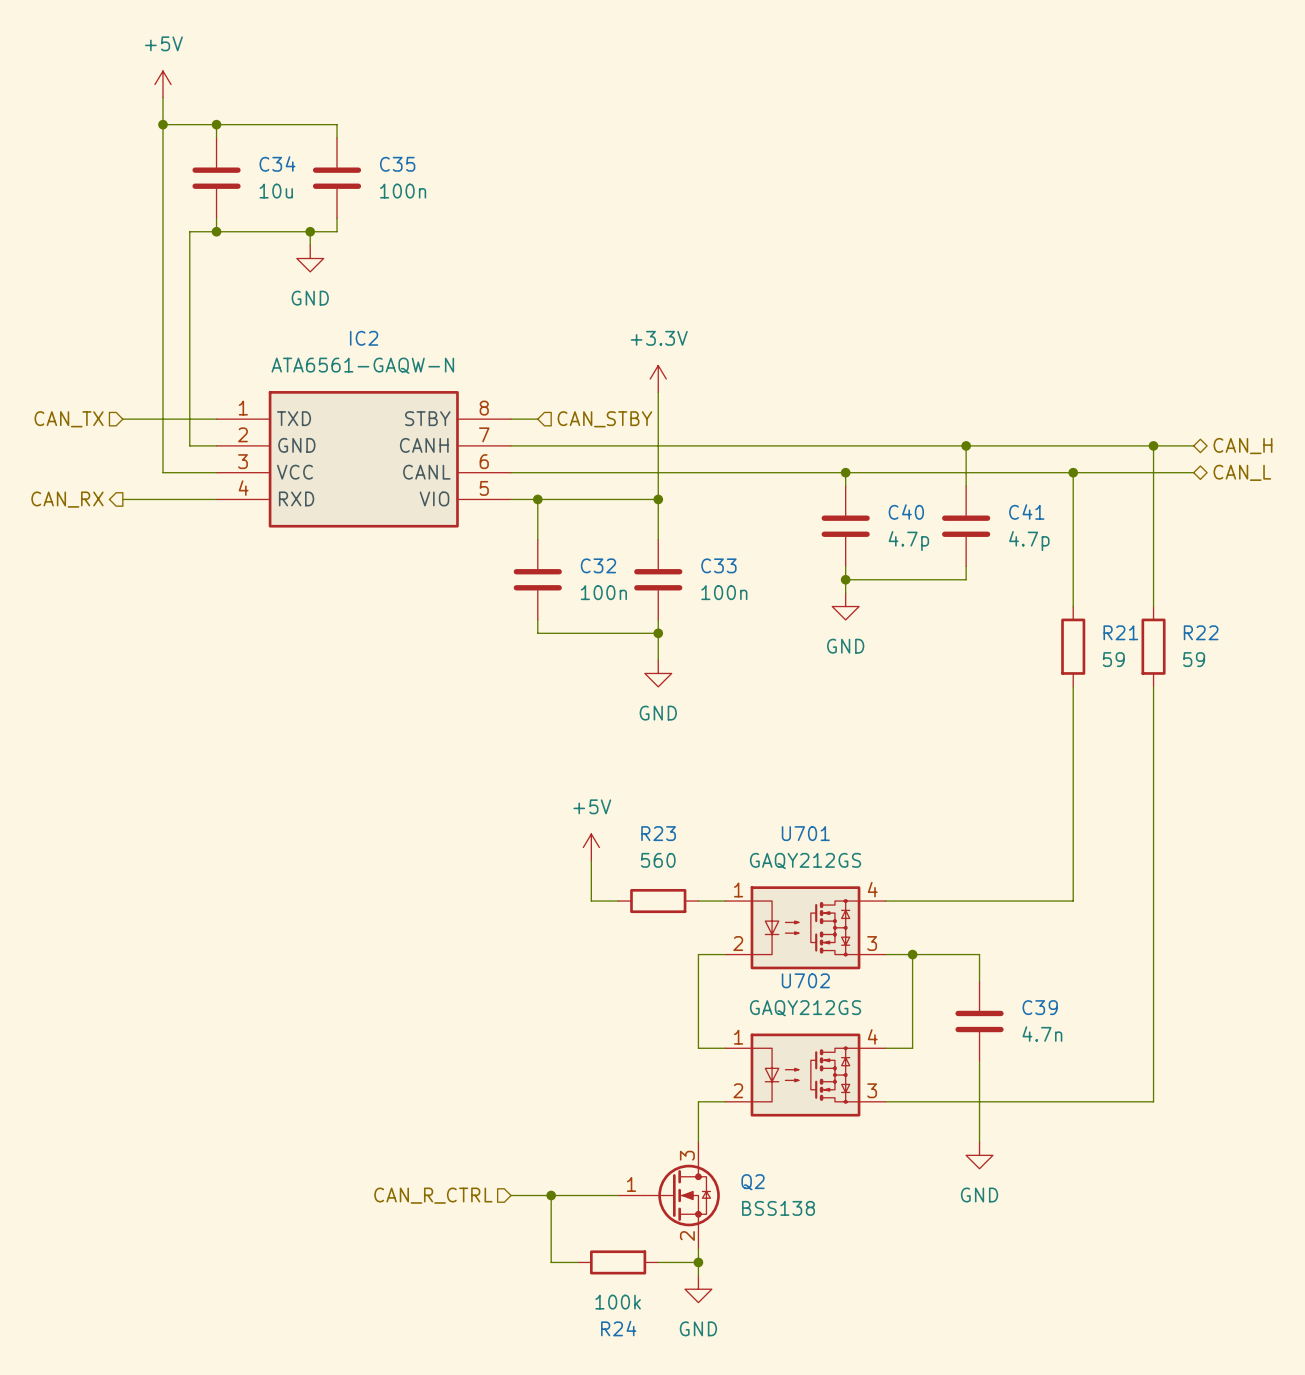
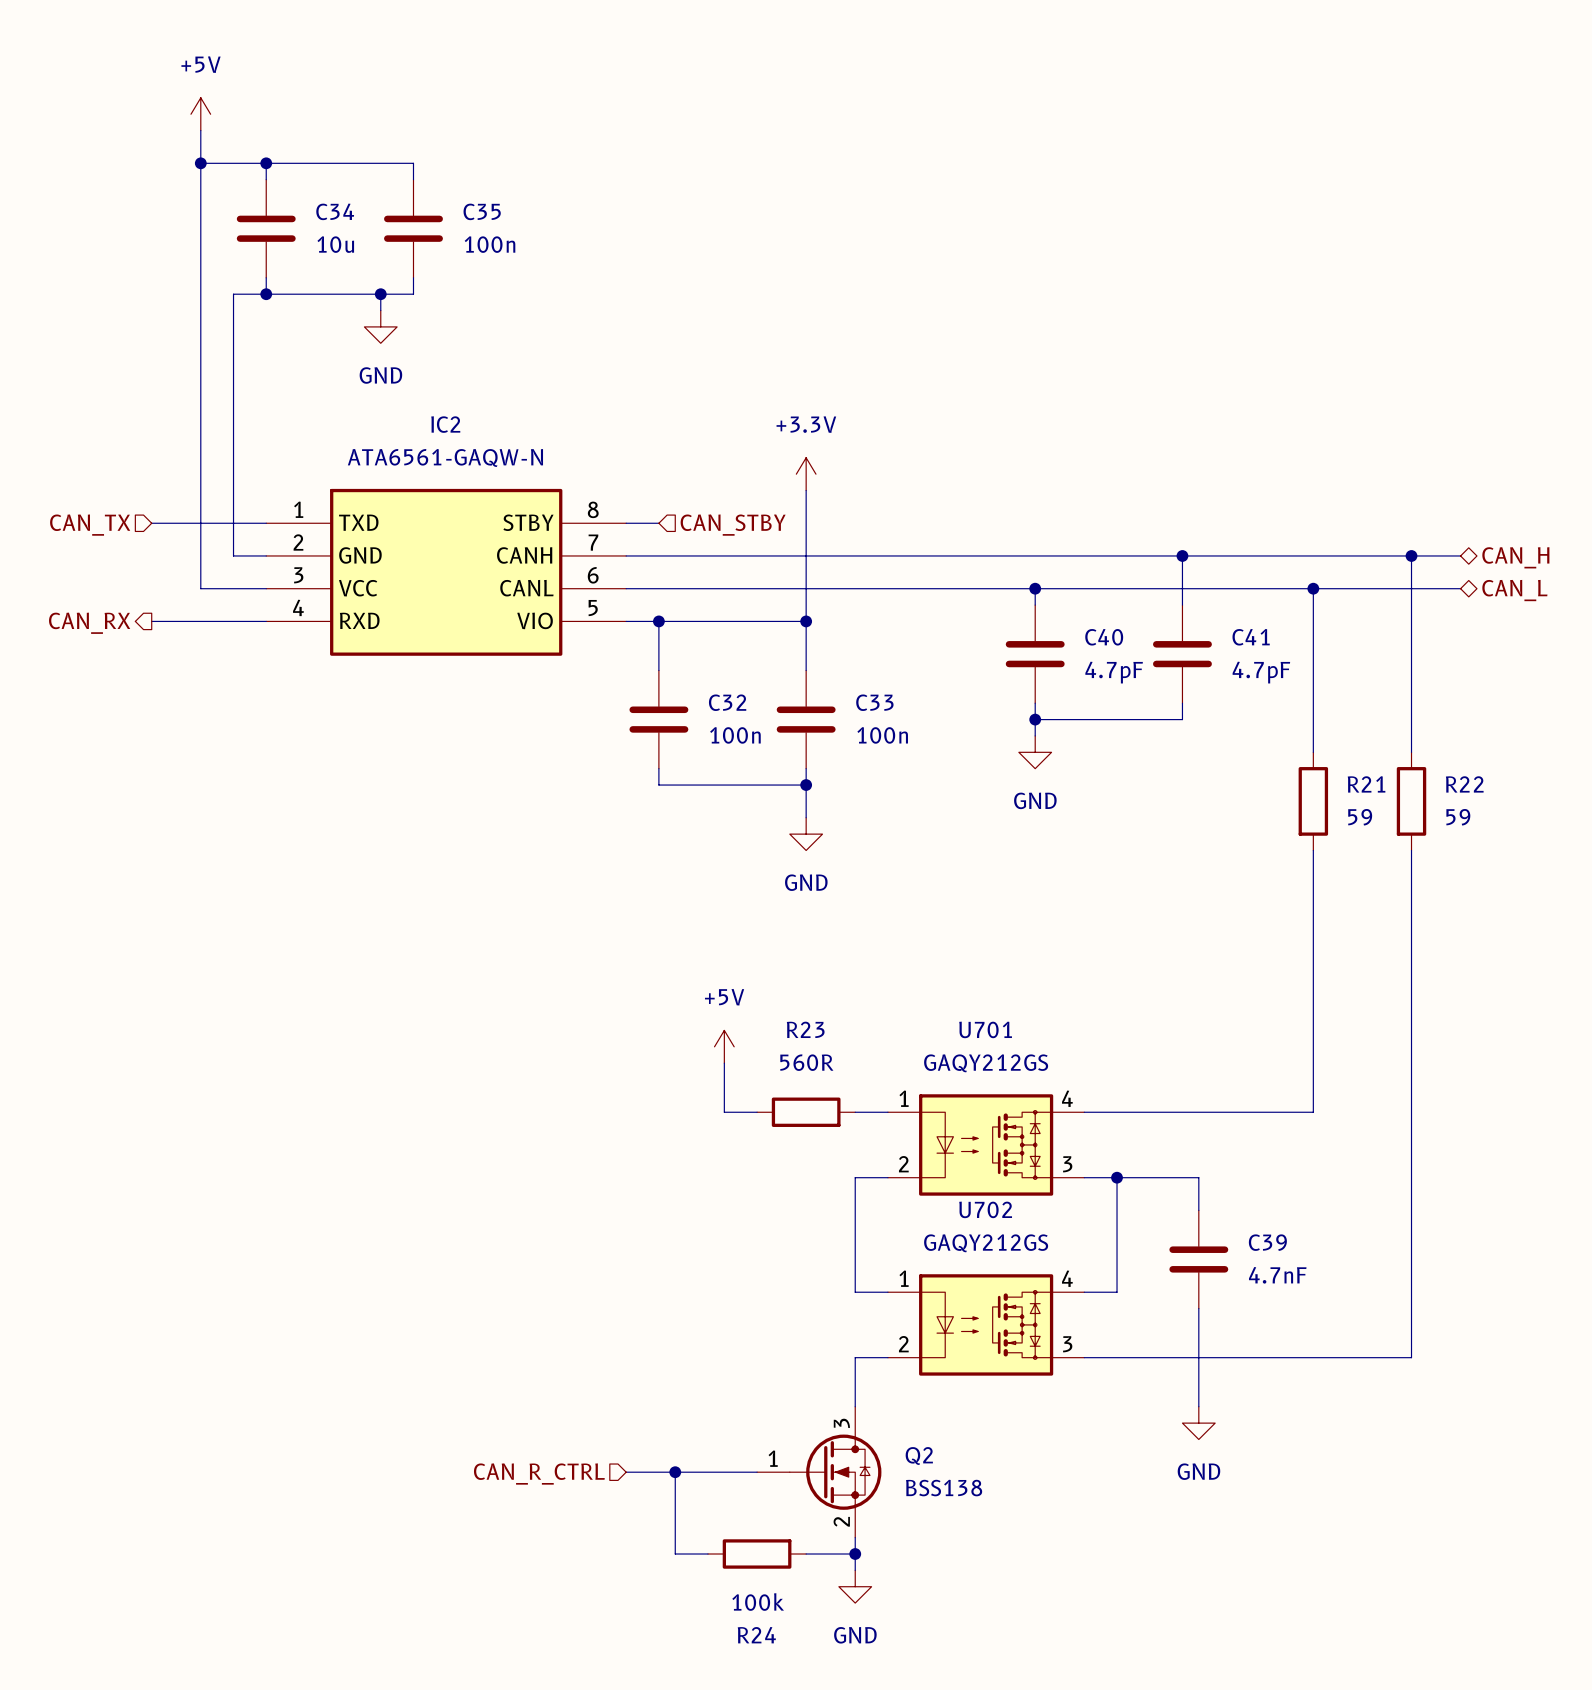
C40 value: 4.7p (908, 541) -> 4.7pF (1114, 672)
C41 value: 4.7p (1029, 541) -> 4.7pF (1261, 672)
R23 value: 560 (658, 860) -> 560R (806, 1062)
C39 value: 4.7n (1042, 1034) -> 4.7nF (1277, 1275)

